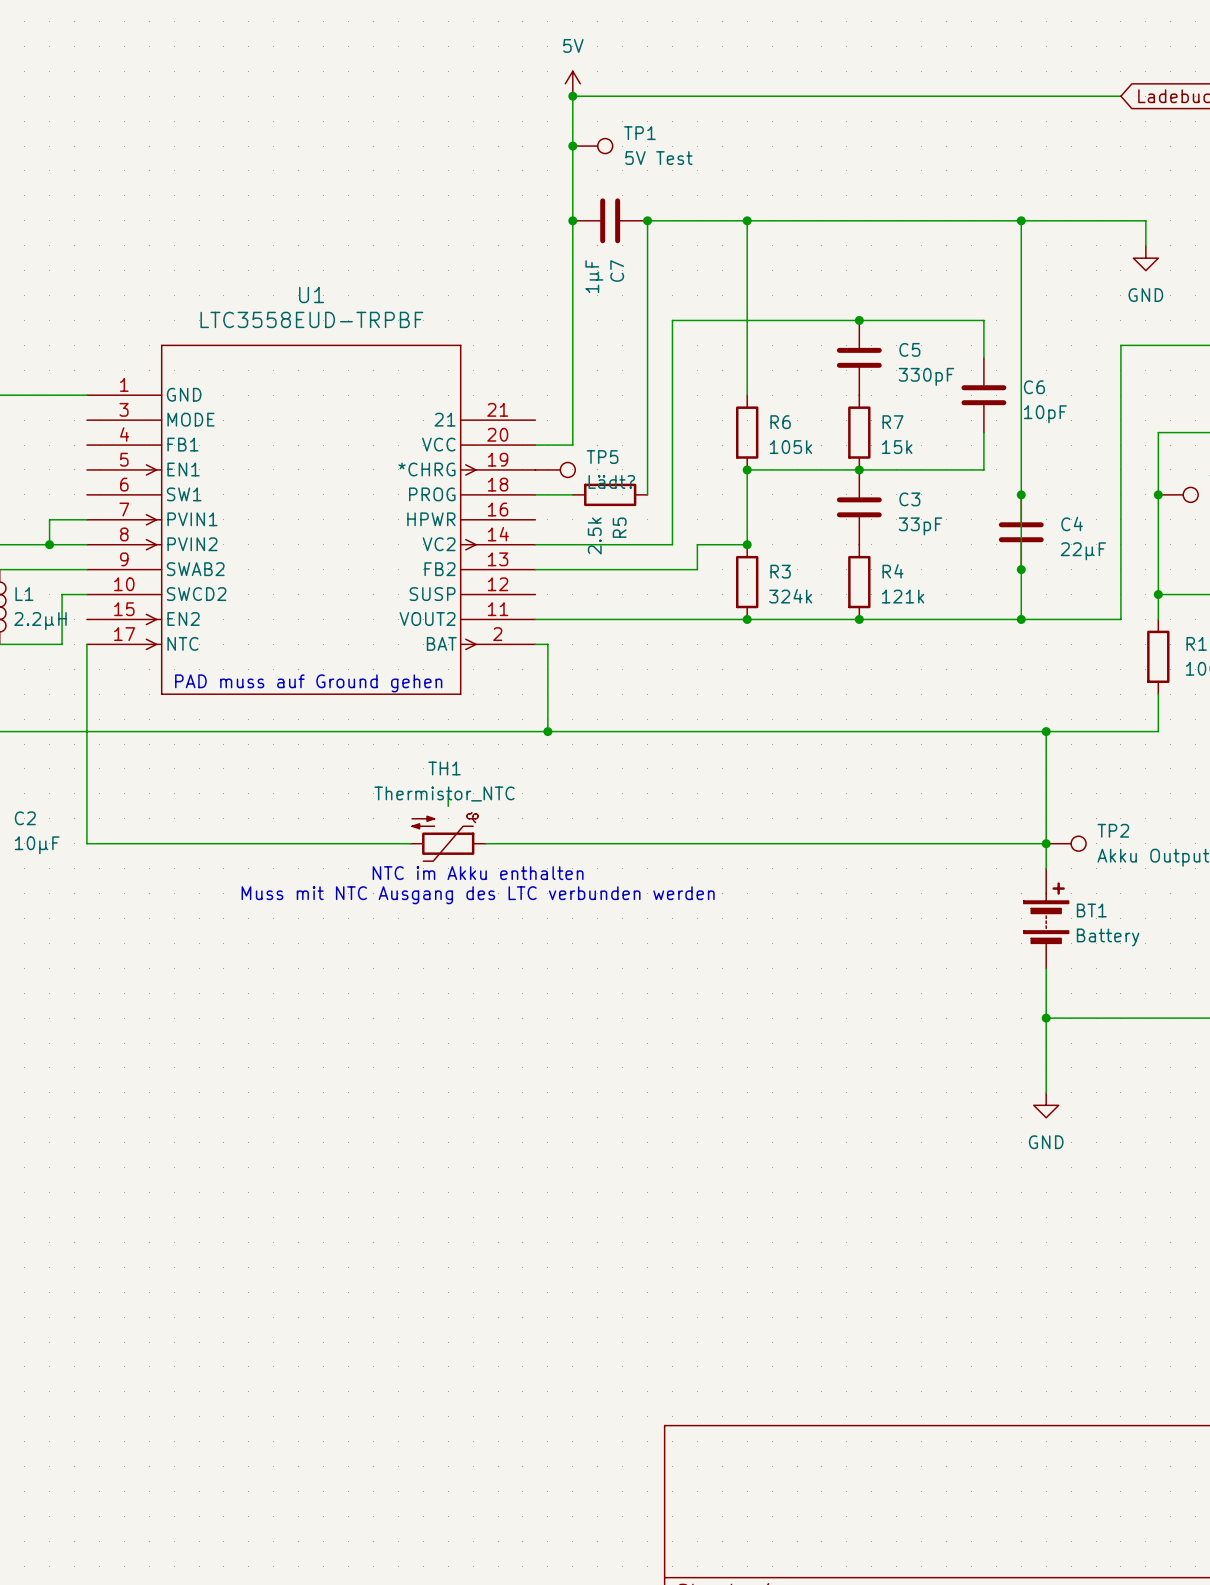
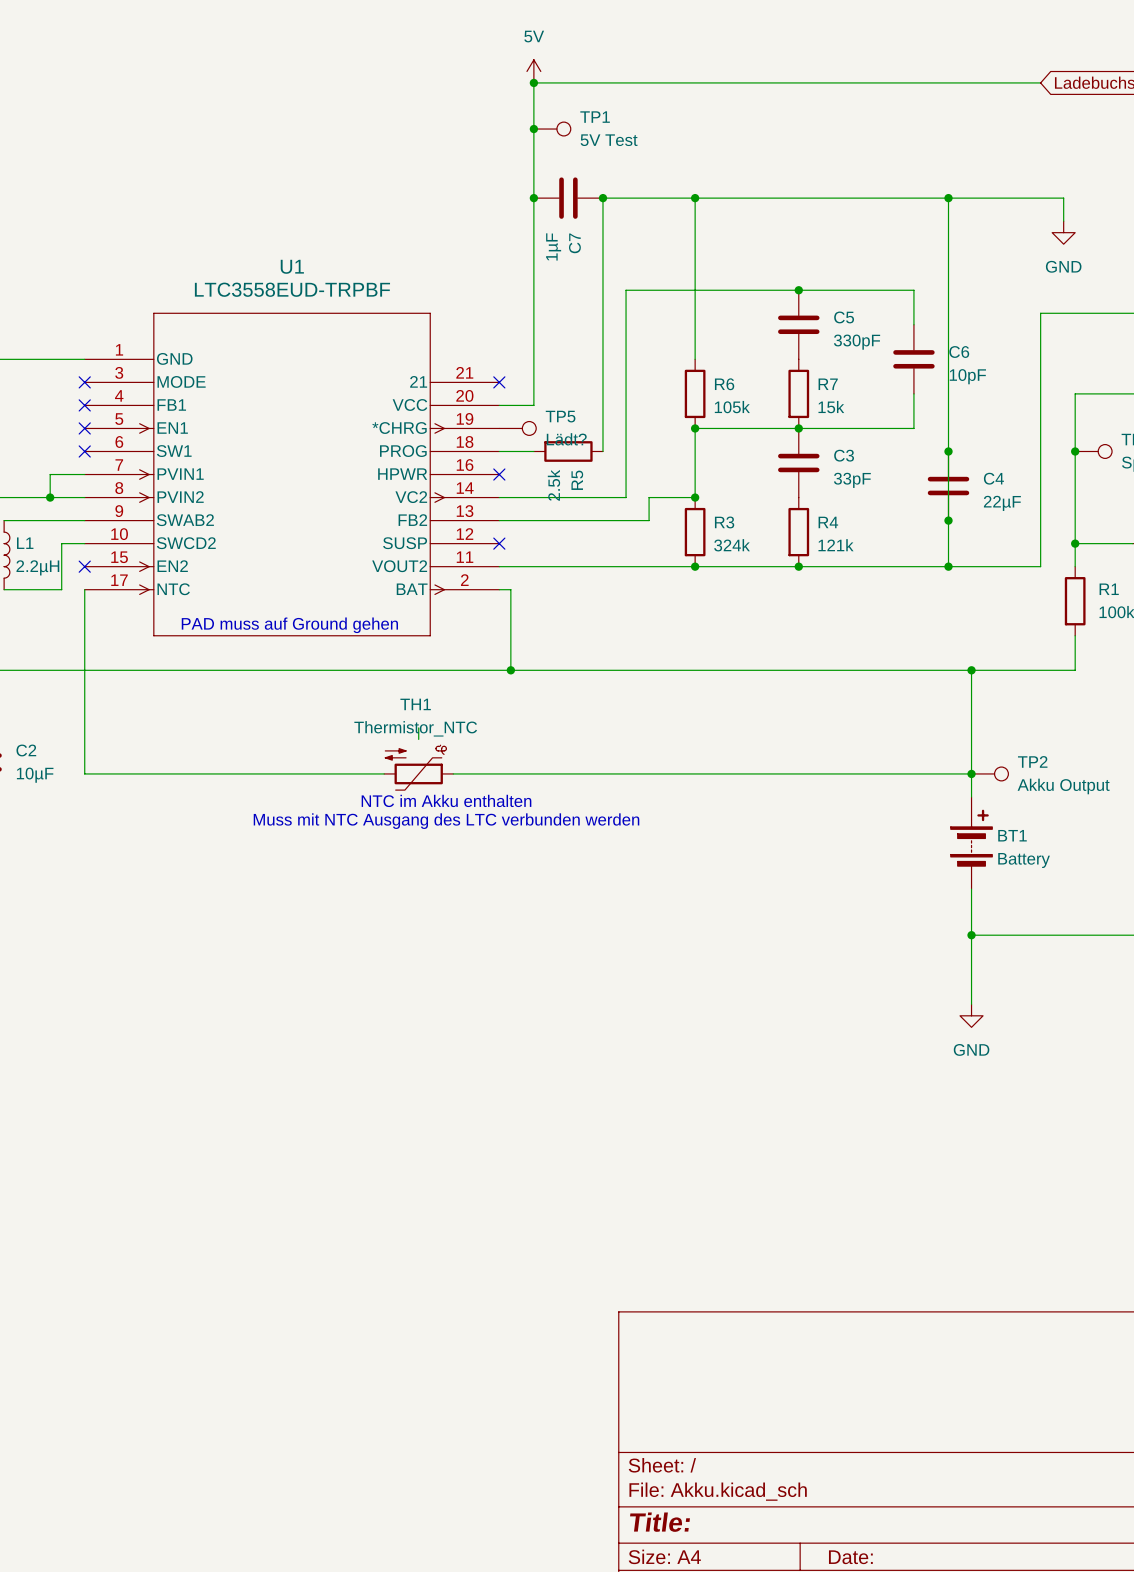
no-connect mark: none -> (84, 382)
no-connect mark: none -> (499, 382)
no-connect mark: none -> (84, 405)
no-connect mark: none -> (84, 428)
no-connect mark: none -> (84, 451)
no-connect mark: none -> (499, 474)
no-connect mark: none -> (499, 543)
no-connect mark: none -> (84, 566)

